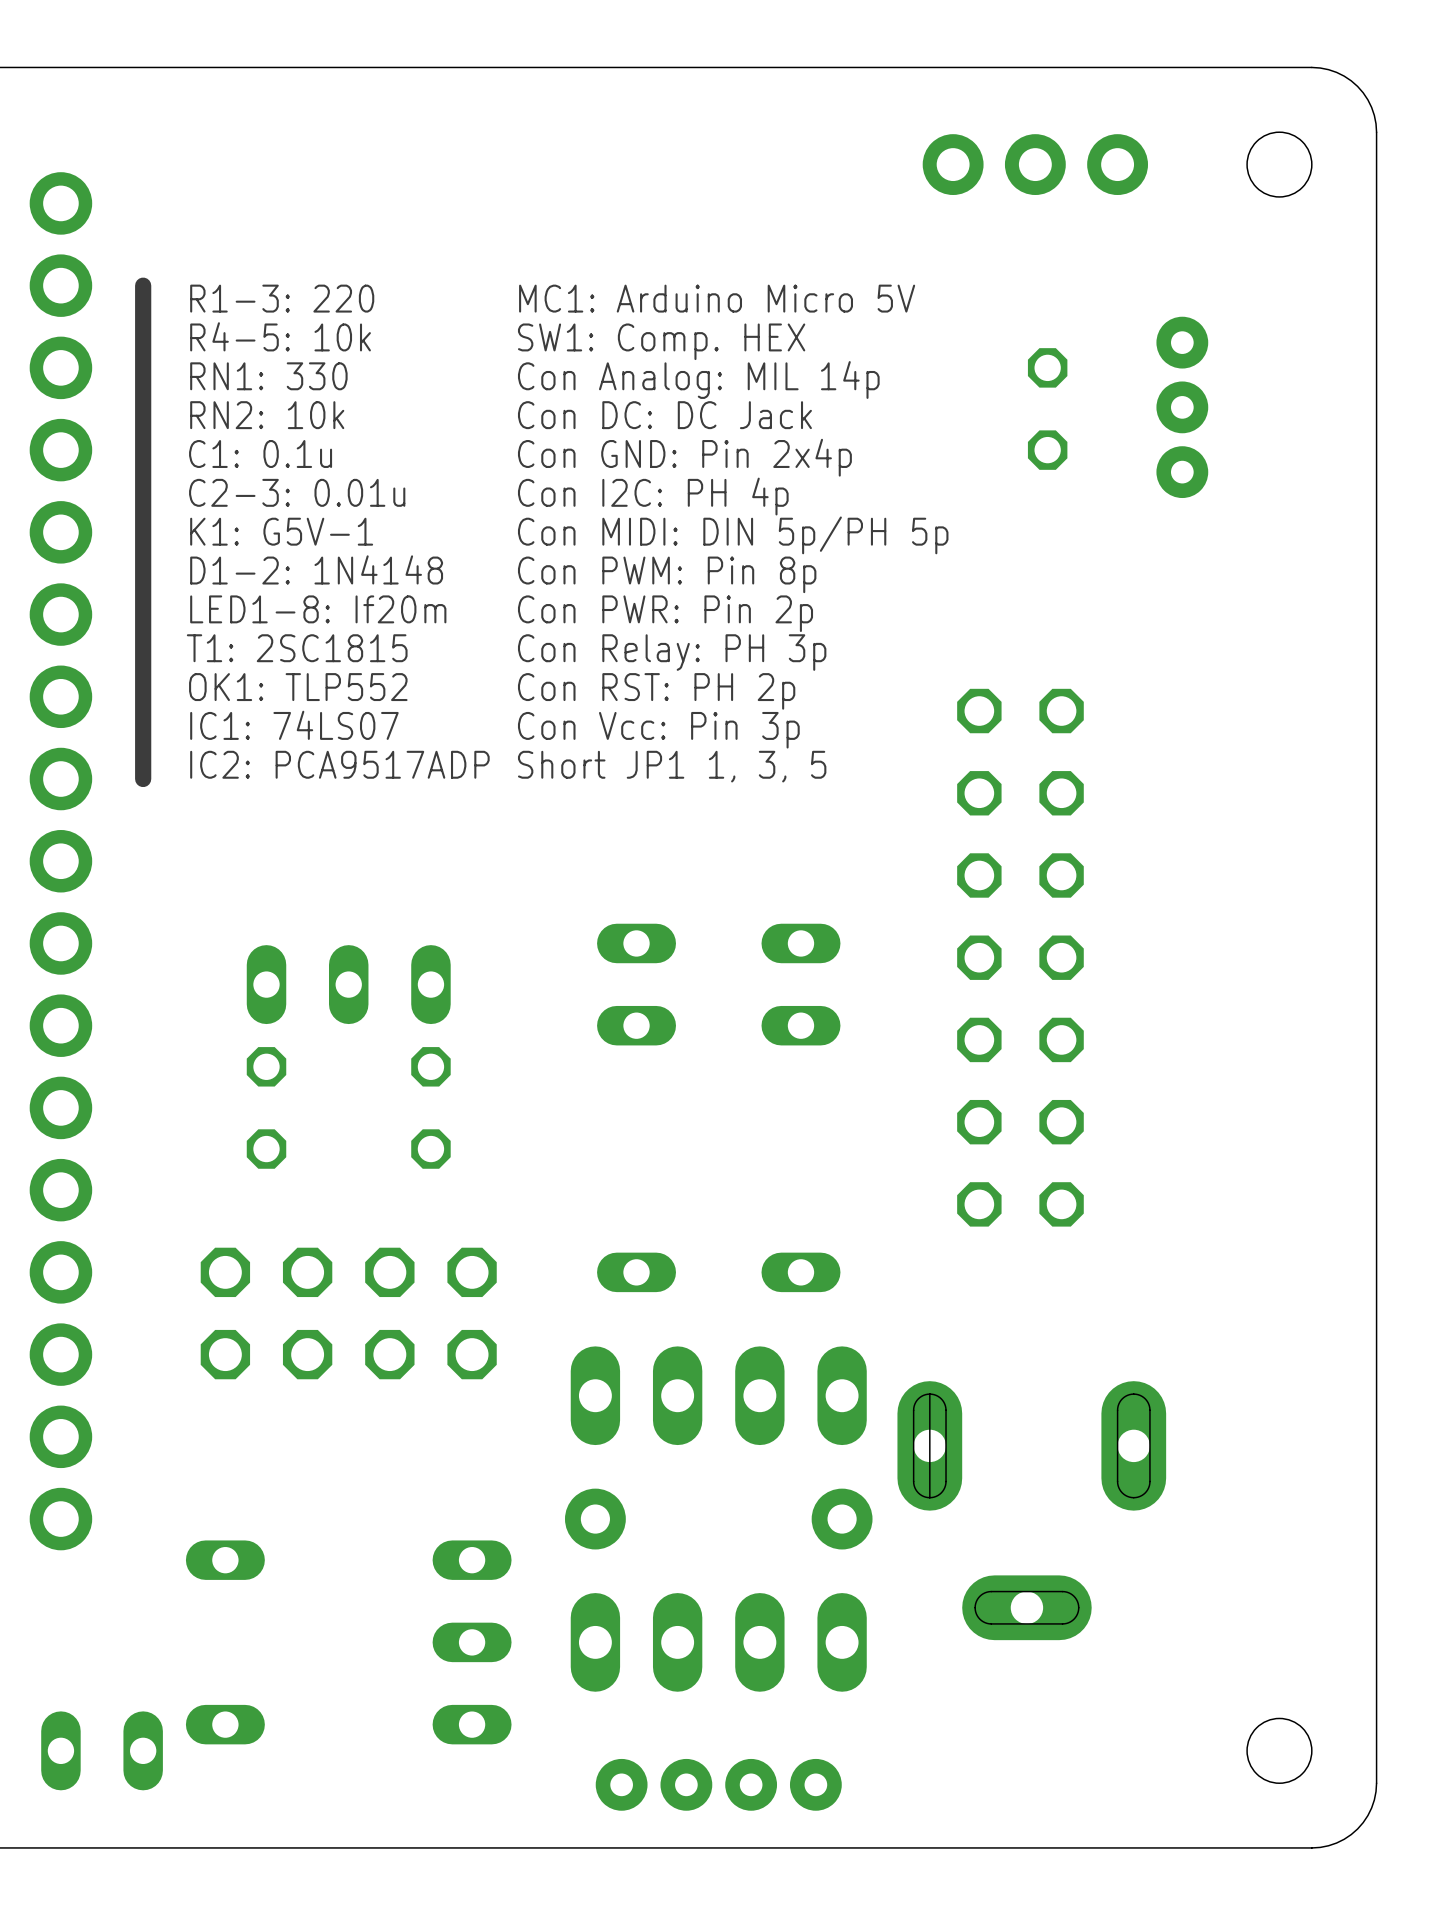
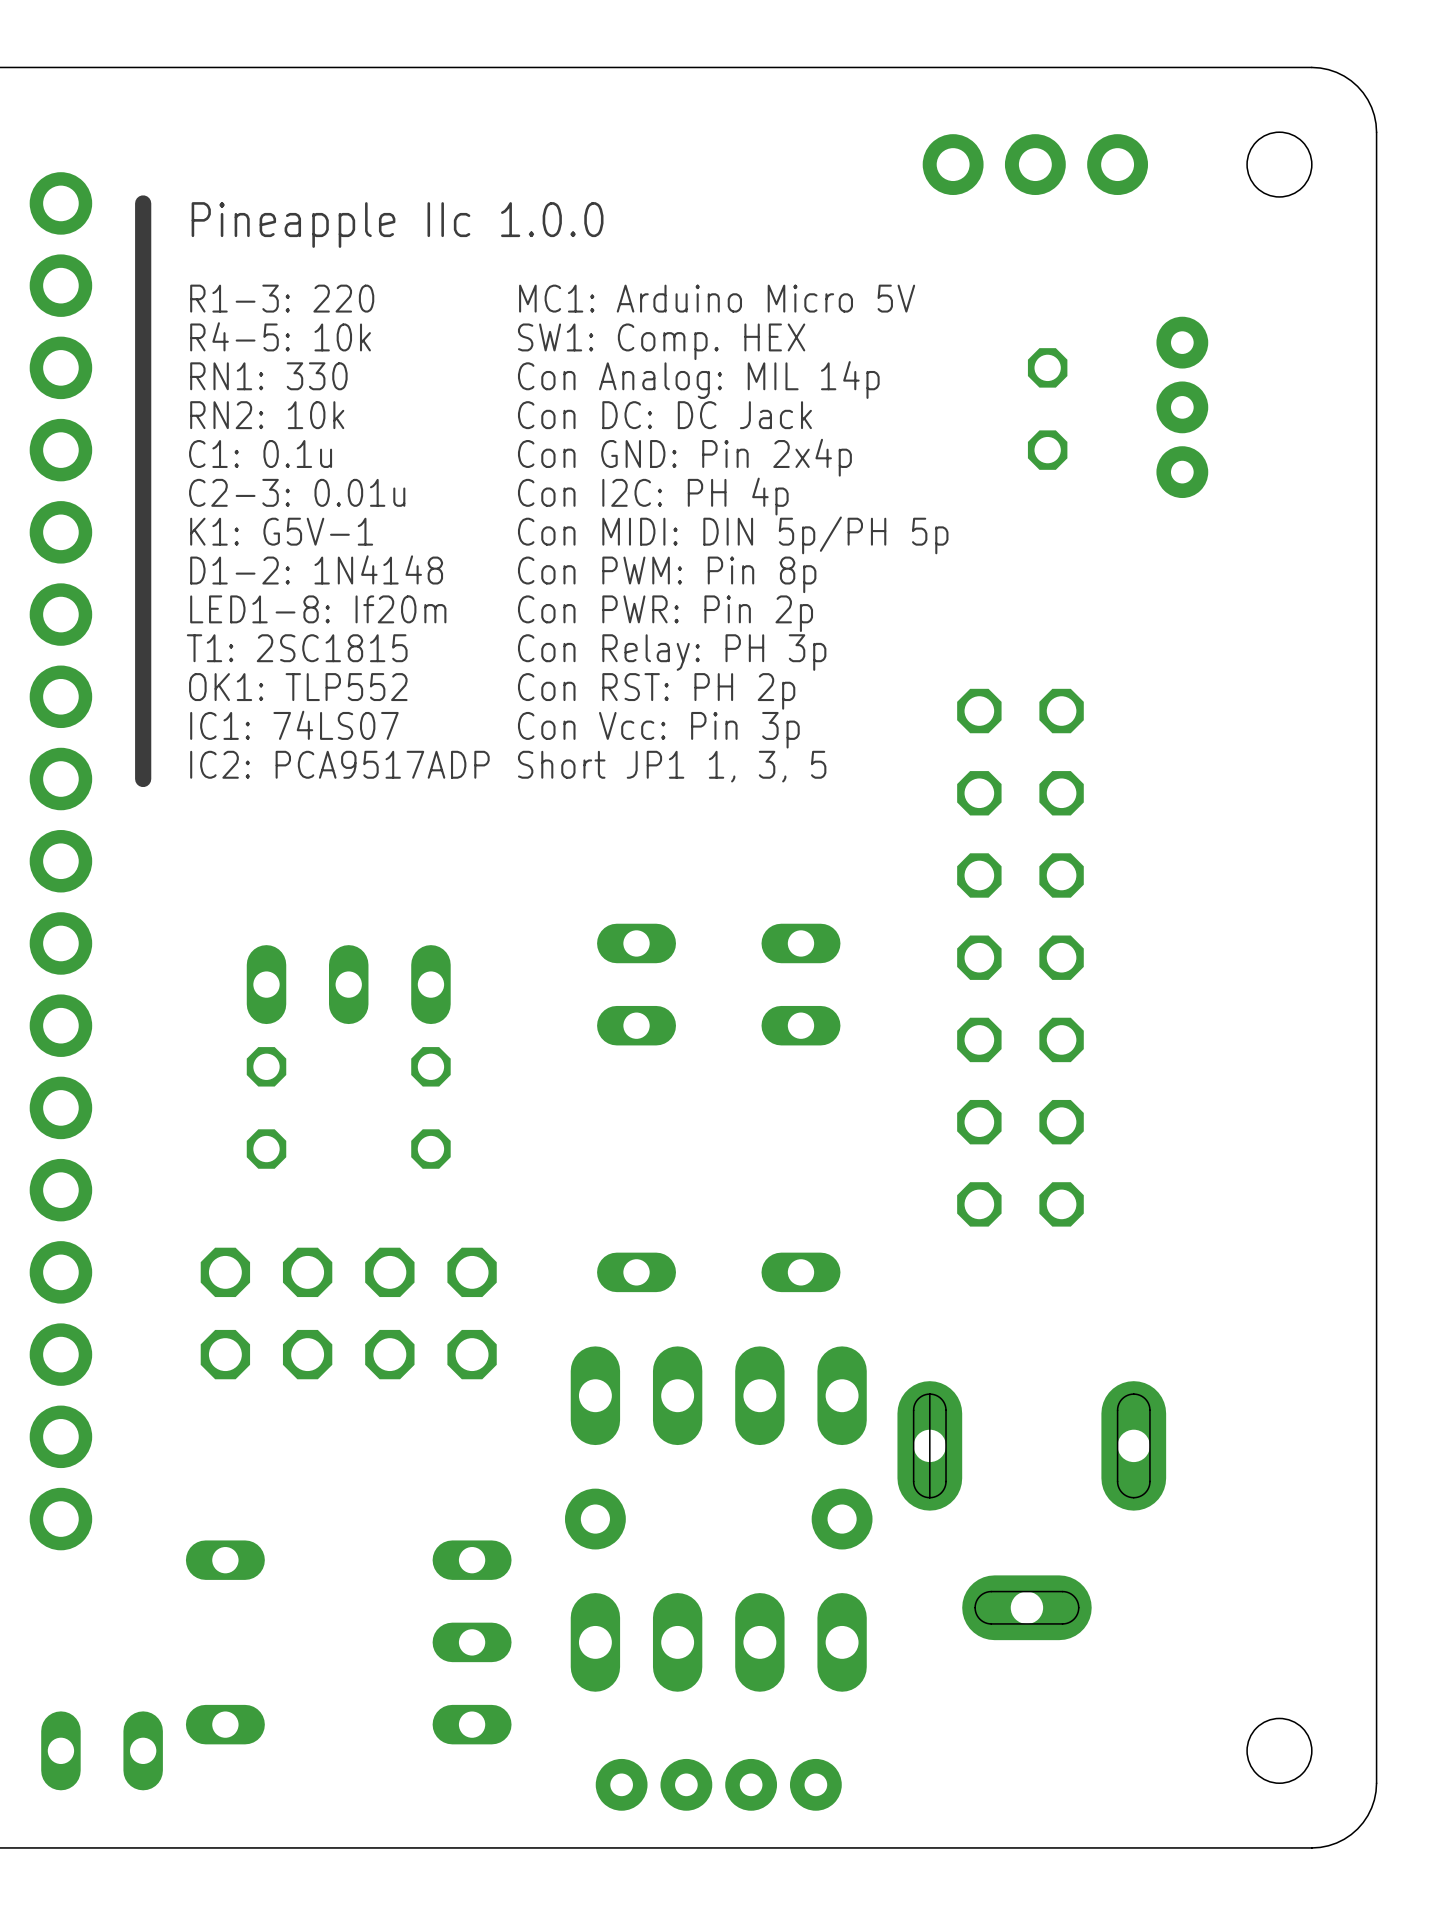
line: none -> (143, 203) (143, 285)
text: none -> Pineapple IIc 1.0.0 (397, 225)

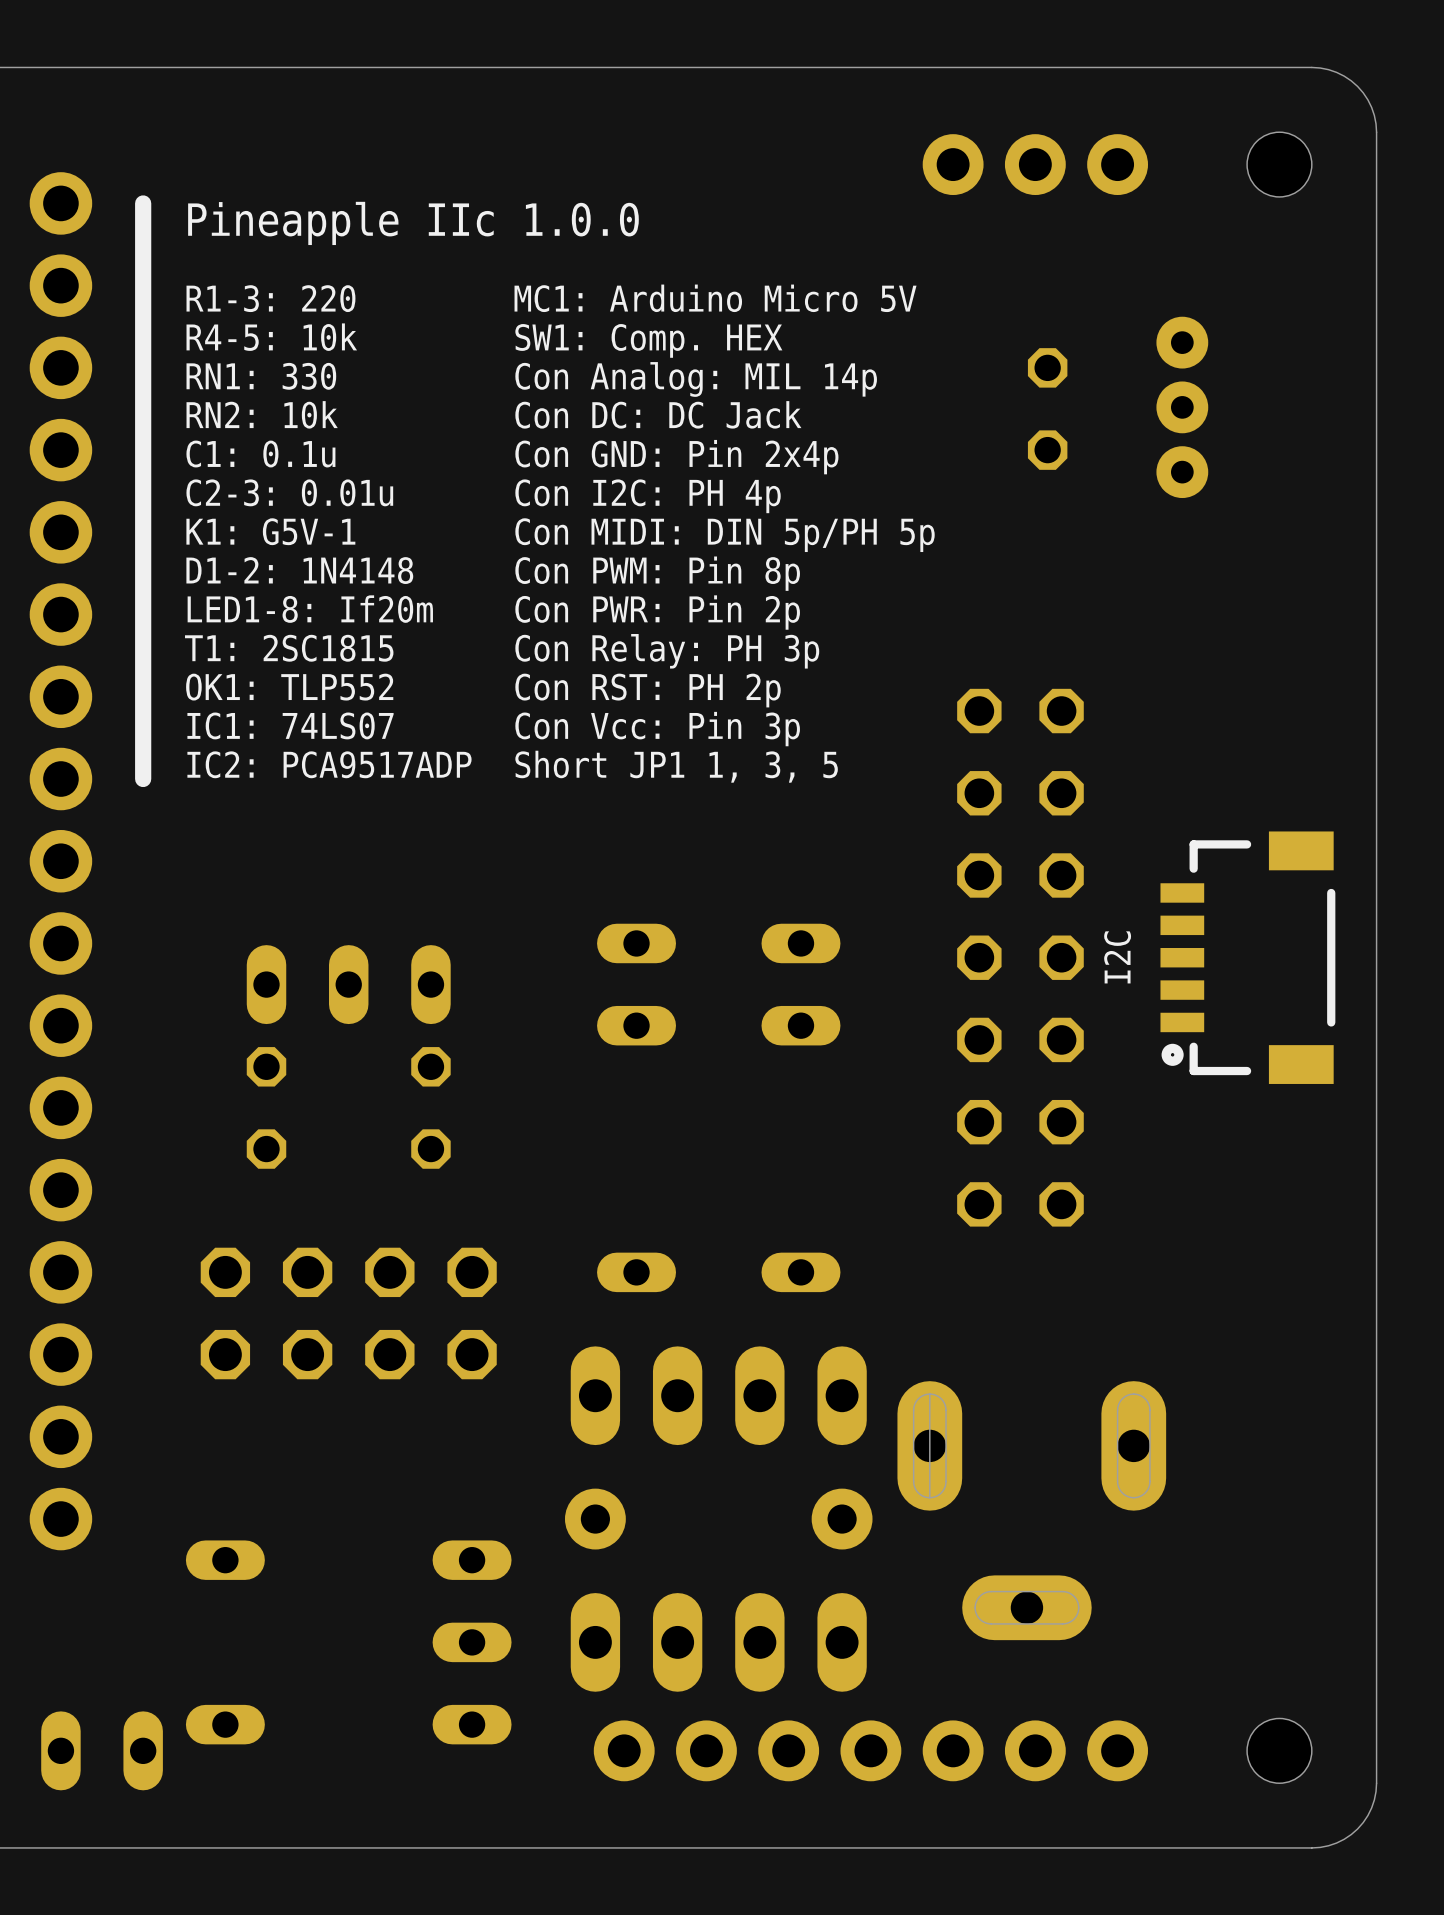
I2C: none -> (1247, 957)
part: none -> (870, 1750)
part: (718, 1784) -> none

